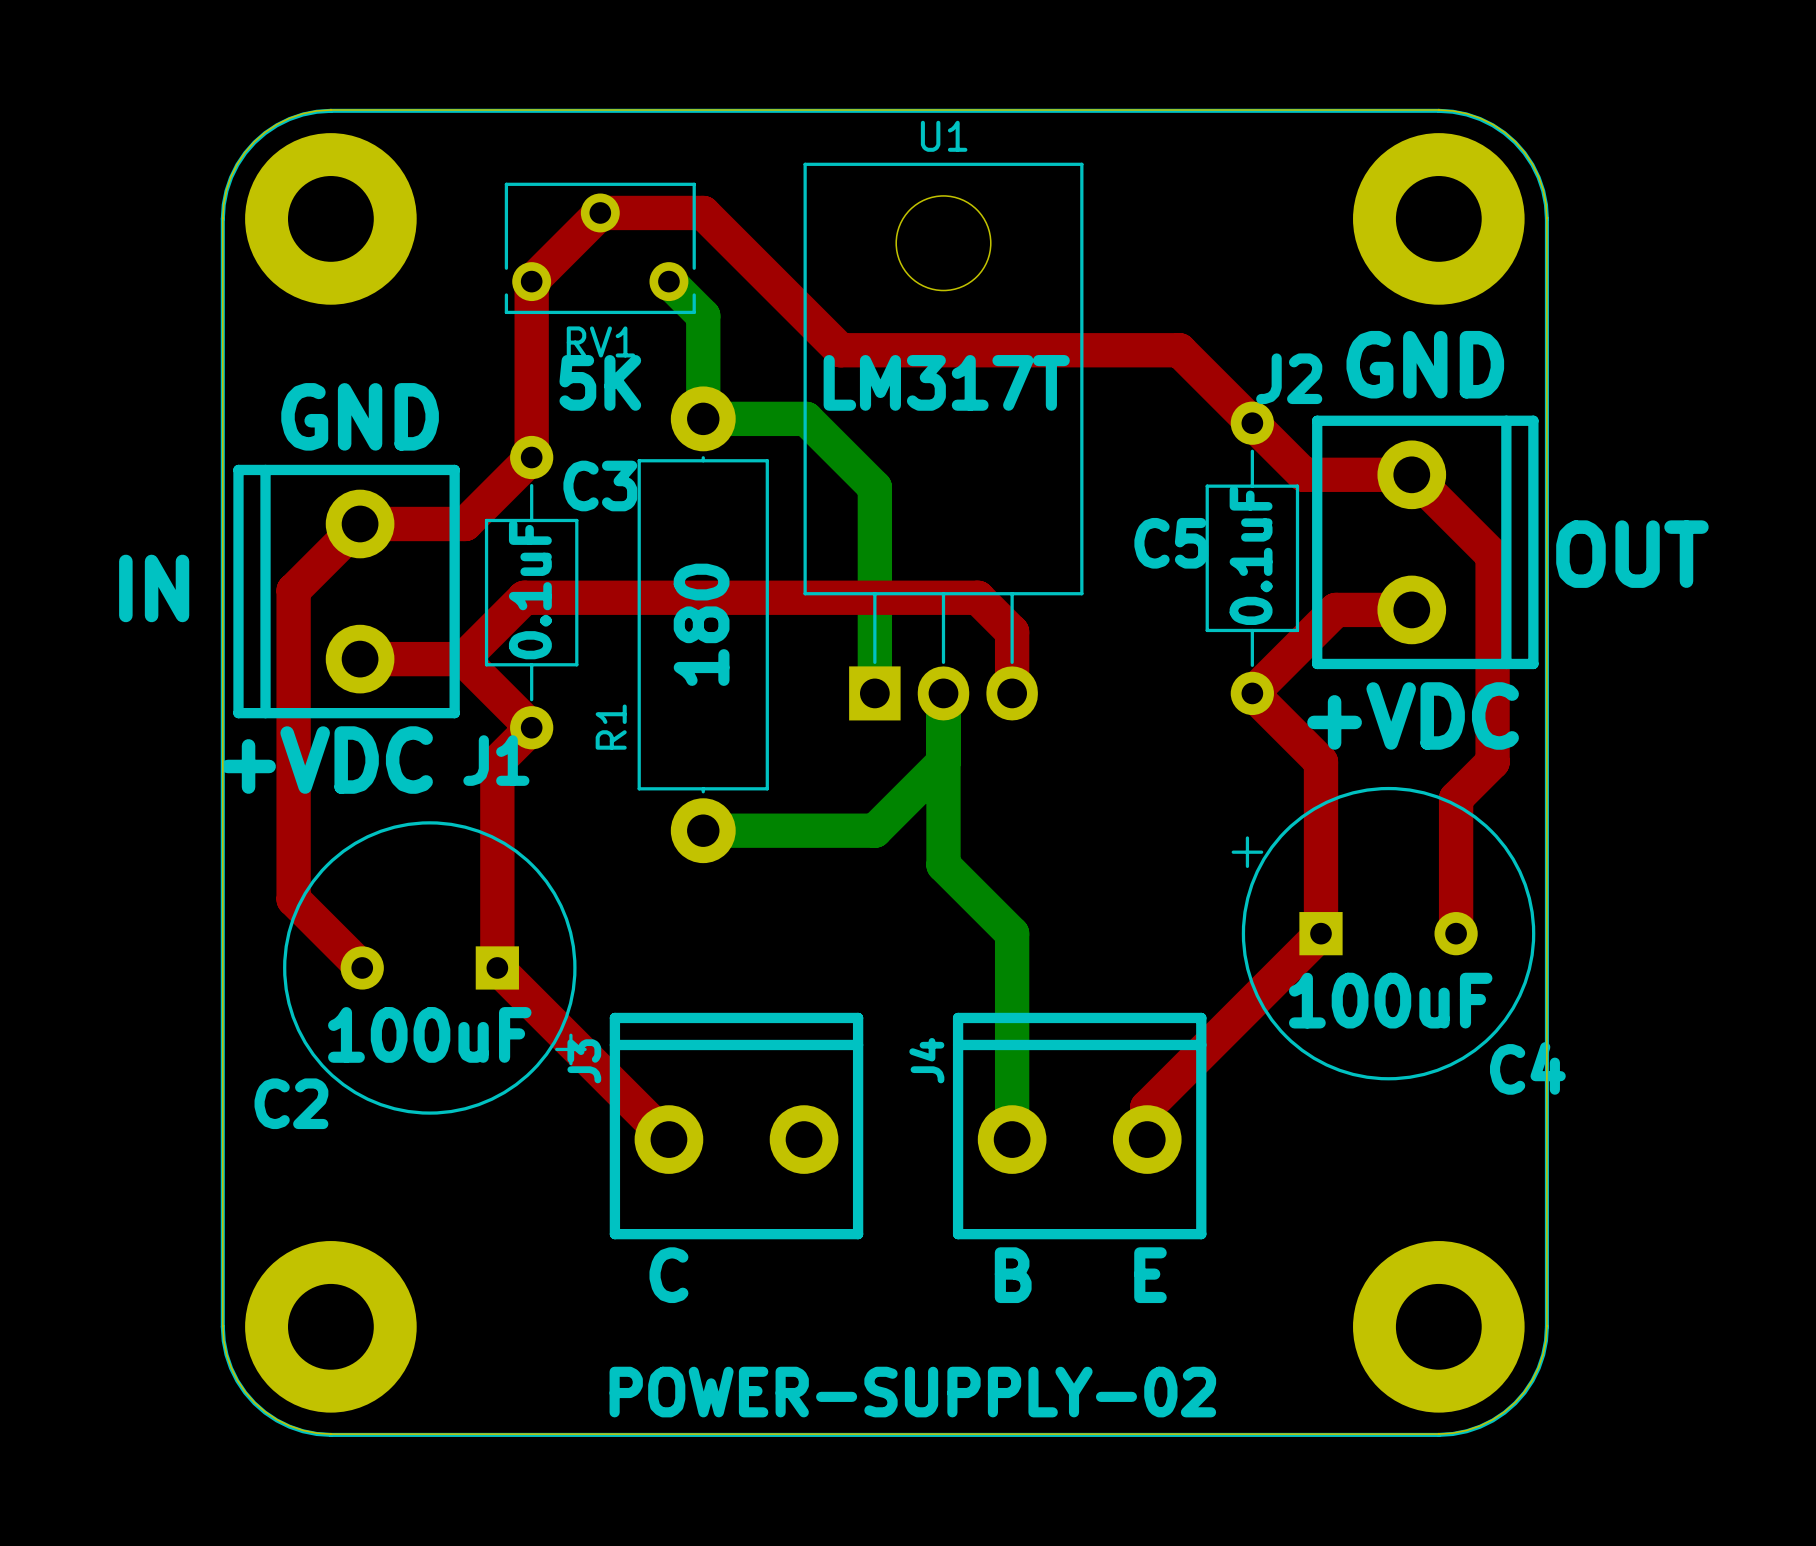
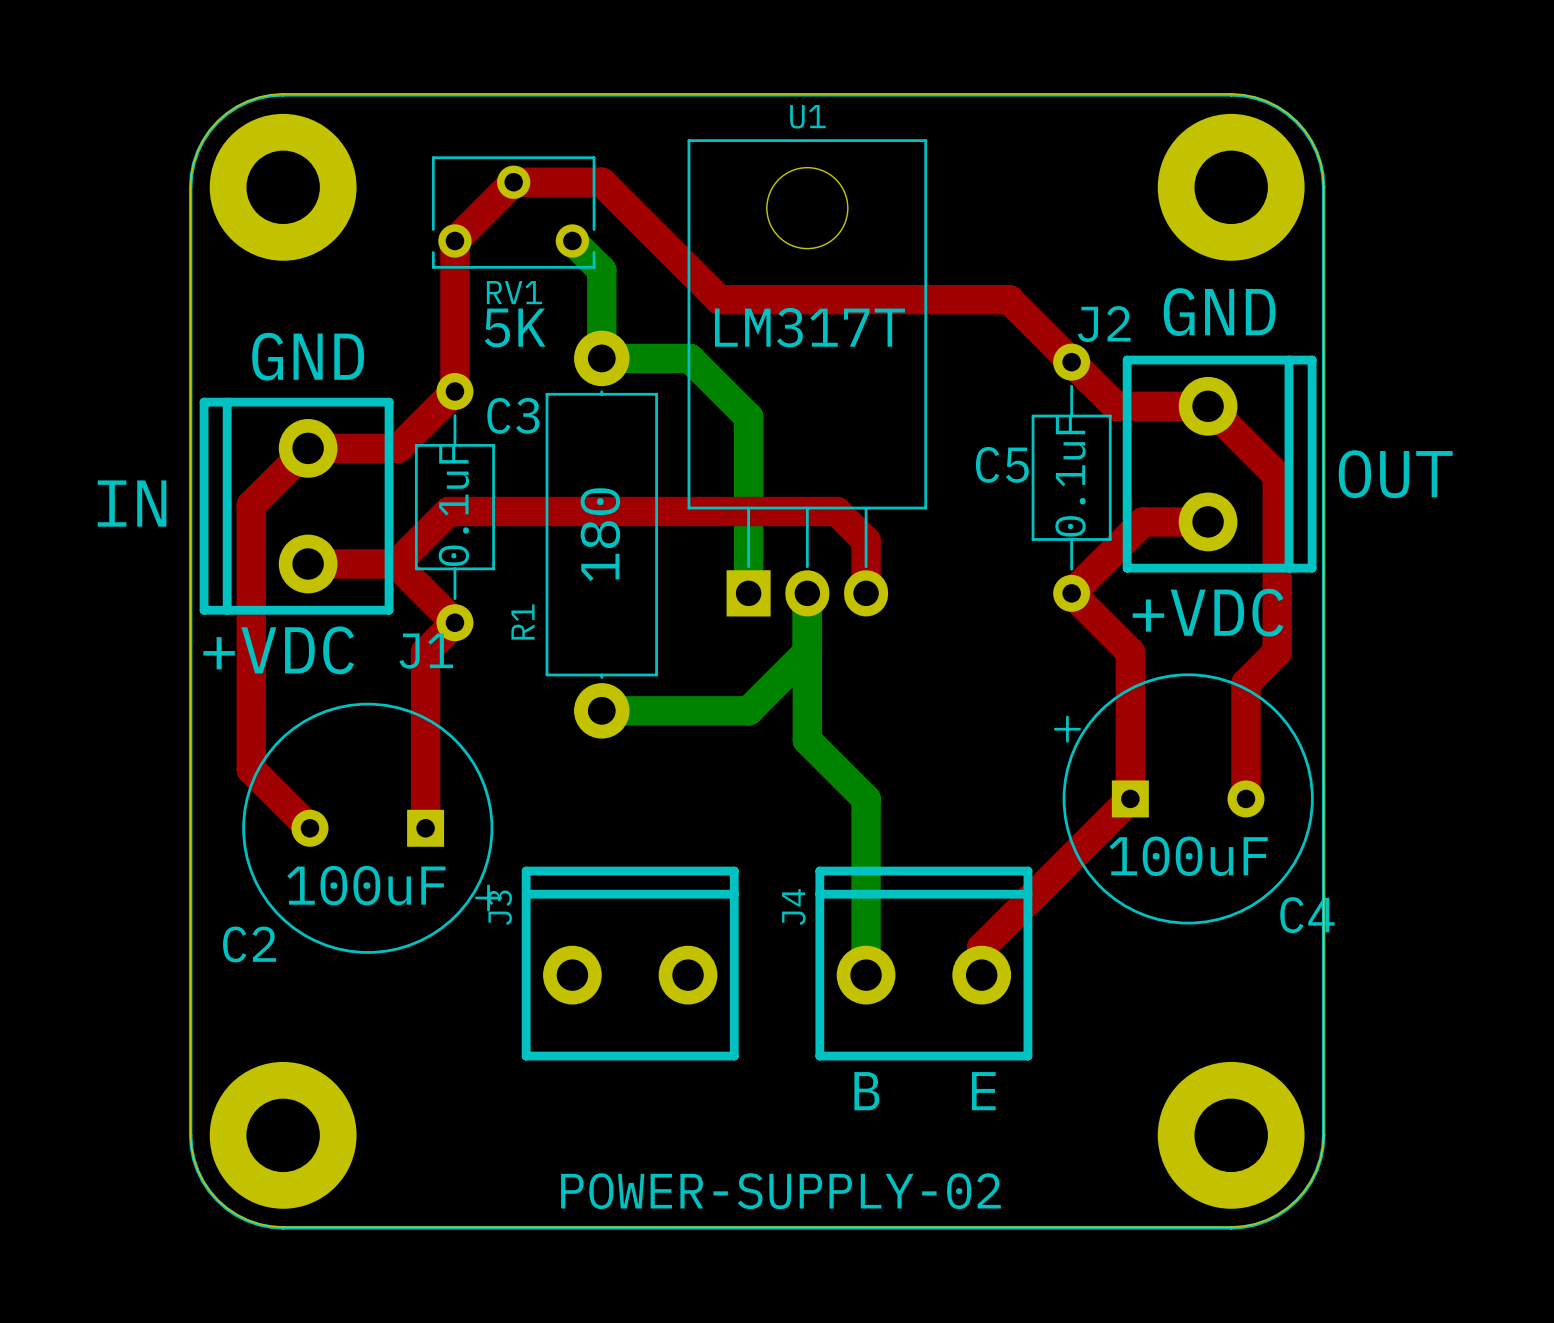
top track: (497, 967) (668, 1139) -> none
text: C (668, 1275) -> none

